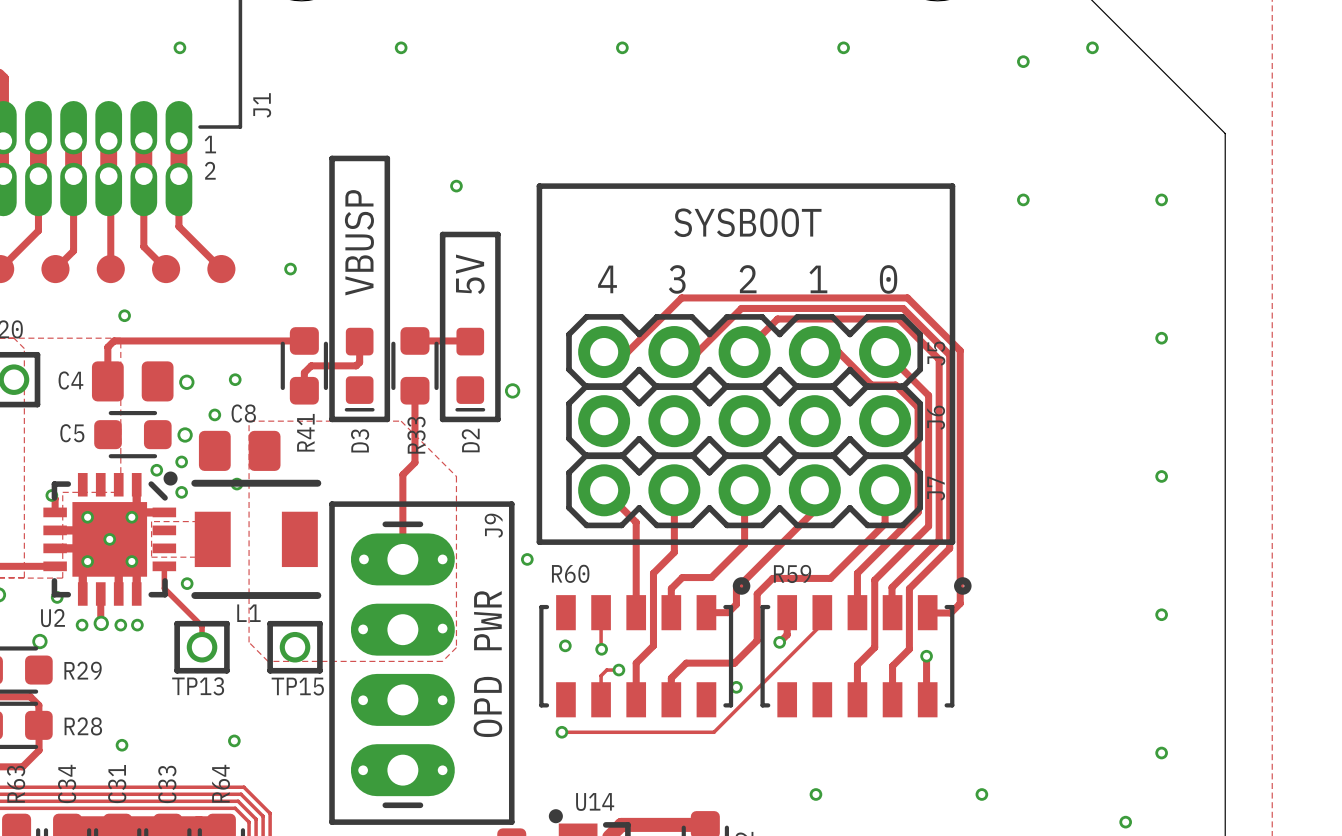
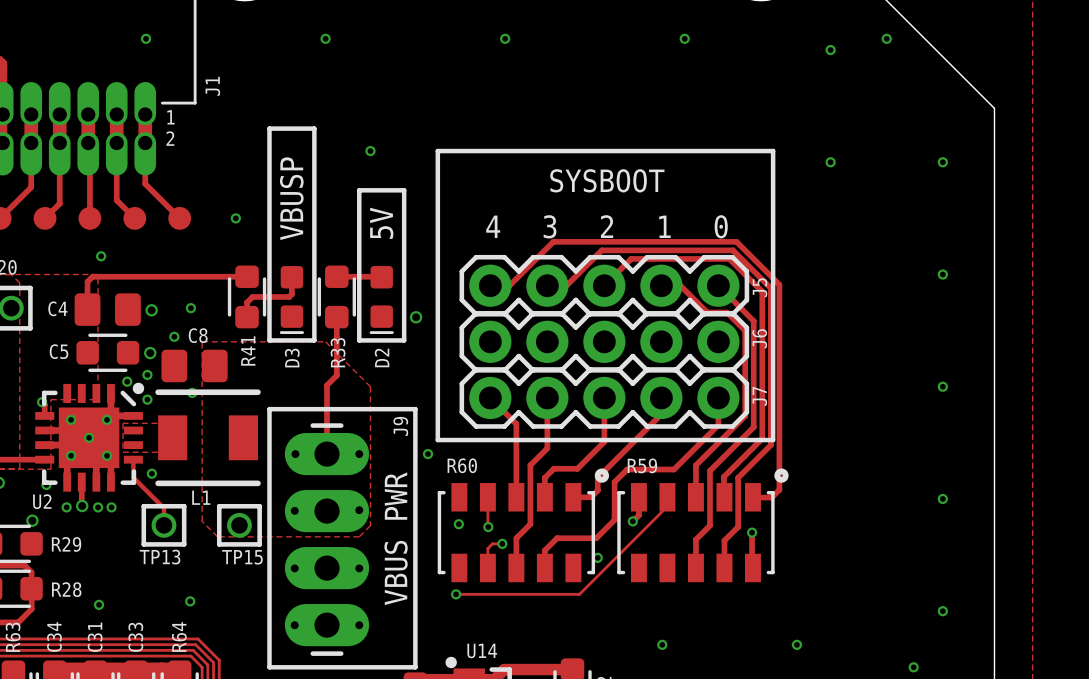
text: OPD PWR (487, 664) -> VBUS PWR (396, 538)

